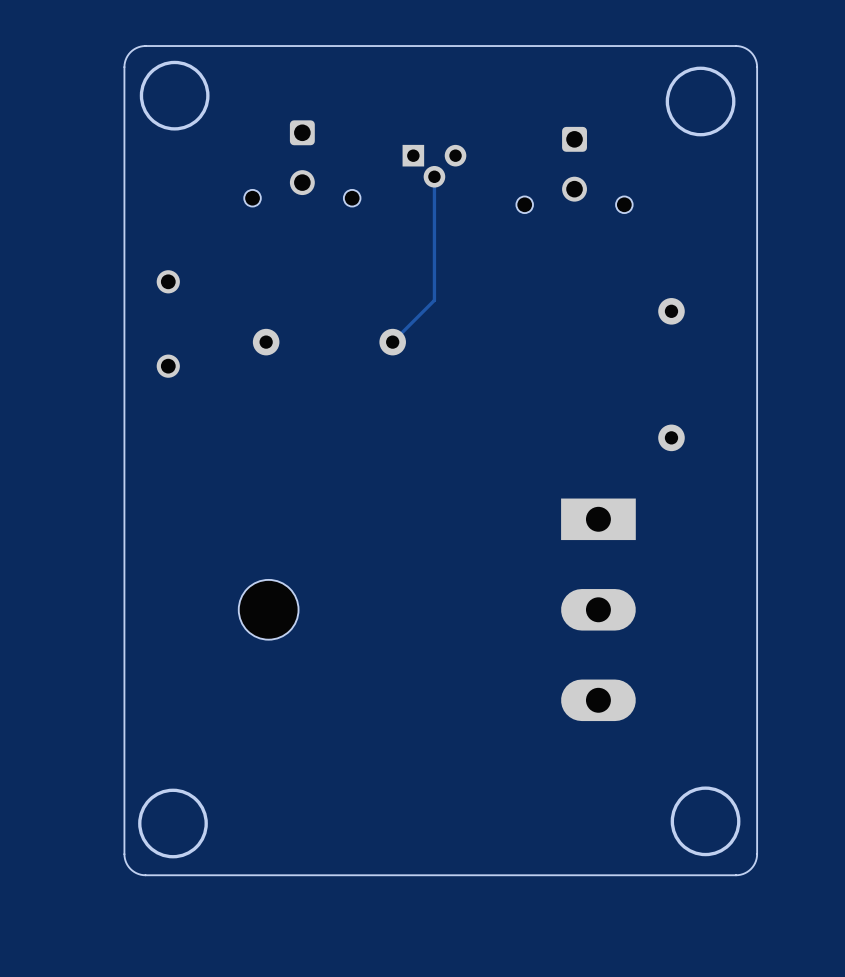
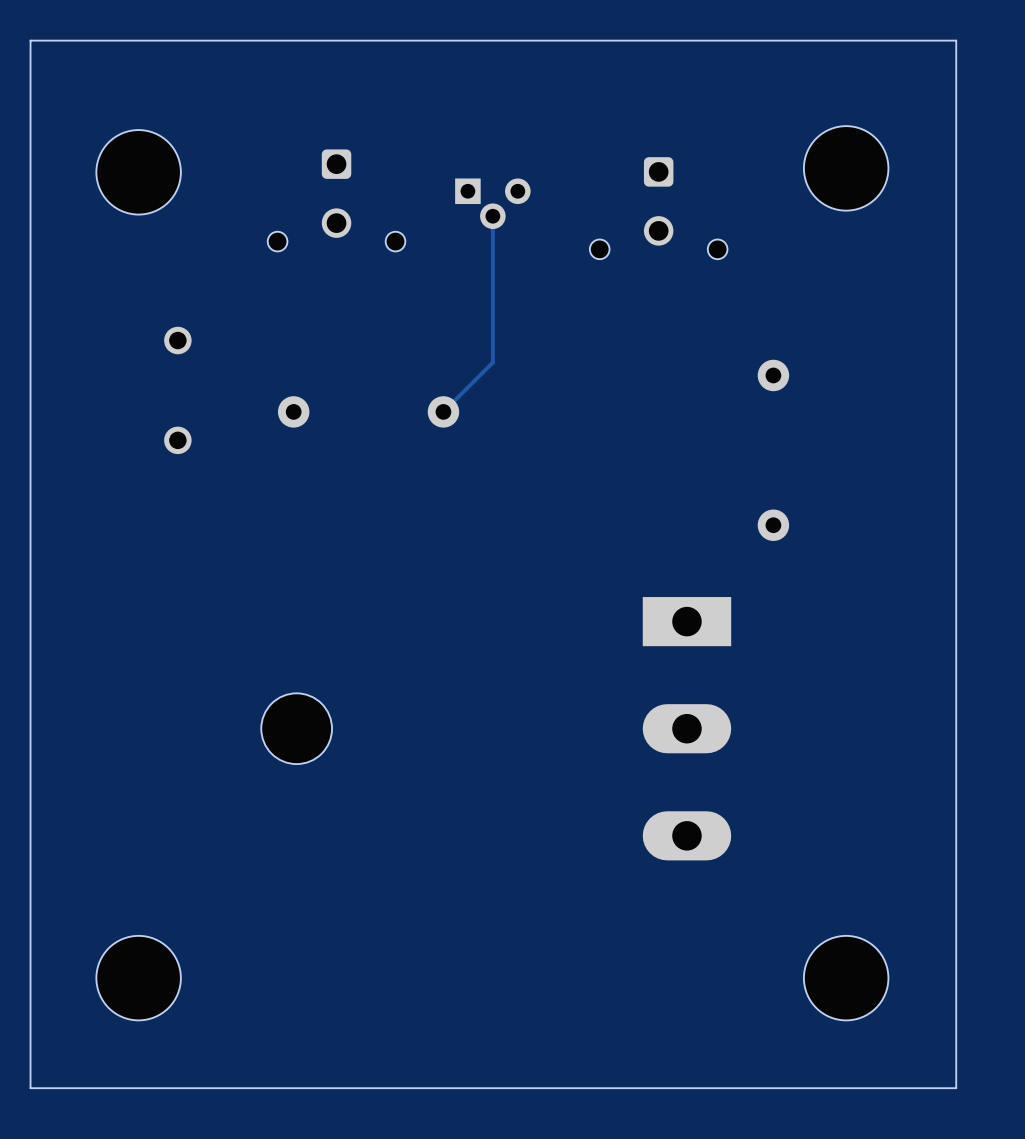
board edge: (736, 46) (145, 46) (136, 48) (129, 53) (124, 67) (124, 854) (126, 863) (132, 870) (145, 875) (736, 875) (745, 873) (752, 867) (757, 854) (757, 67) (755, 60) (750, 52) (742, 47) (736, 46) -> (956, 40) (956, 1088) (30, 1088) (30, 40) (956, 40)
round board edge: [139, 60, 210, 131] -> none
round board edge: [665, 66, 736, 137] -> none
part: none -> (846, 168)
part: none -> (138, 172)
round board edge: [670, 786, 741, 857] -> none
round board edge: [138, 788, 208, 859] -> none
part: none -> (138, 978)
part: none -> (846, 978)

